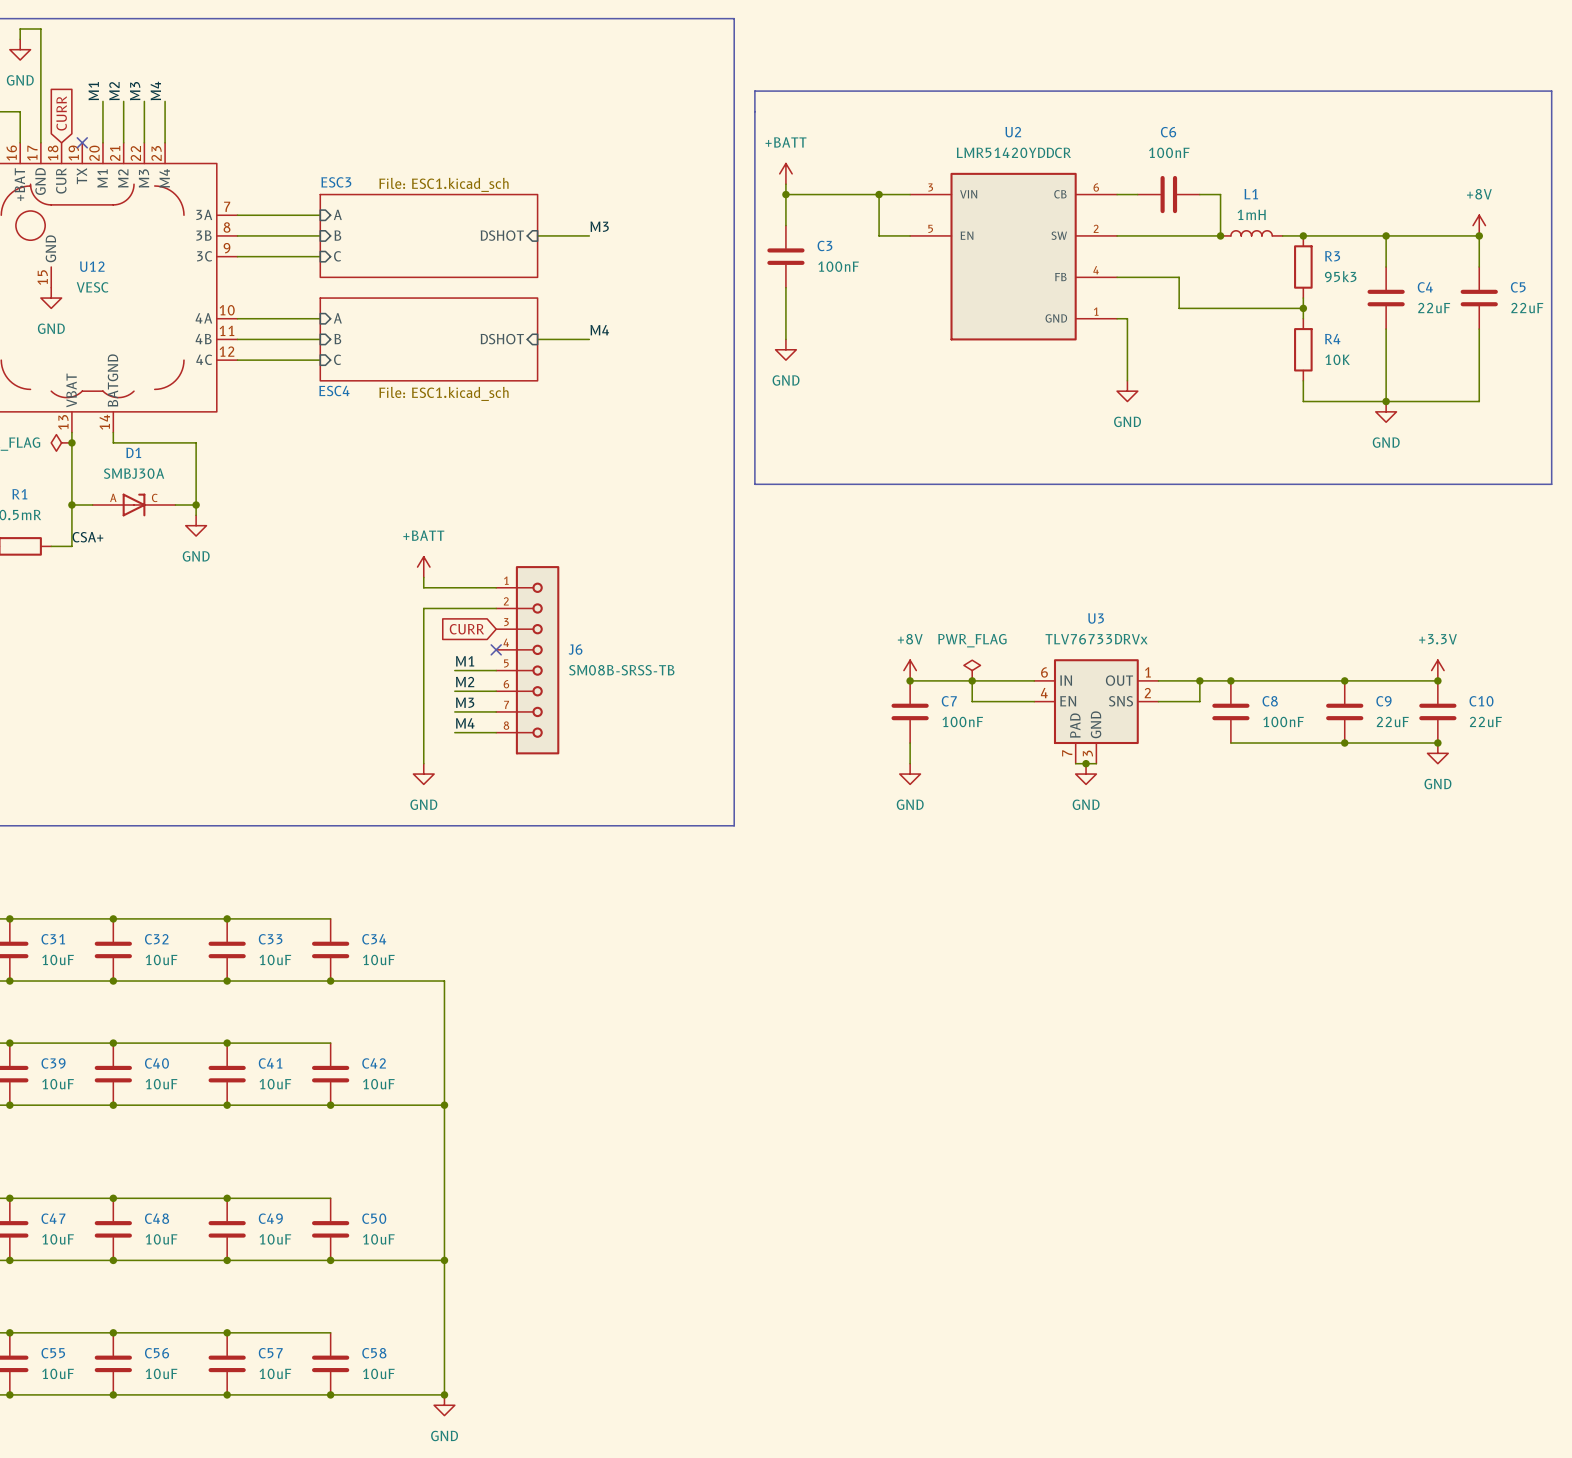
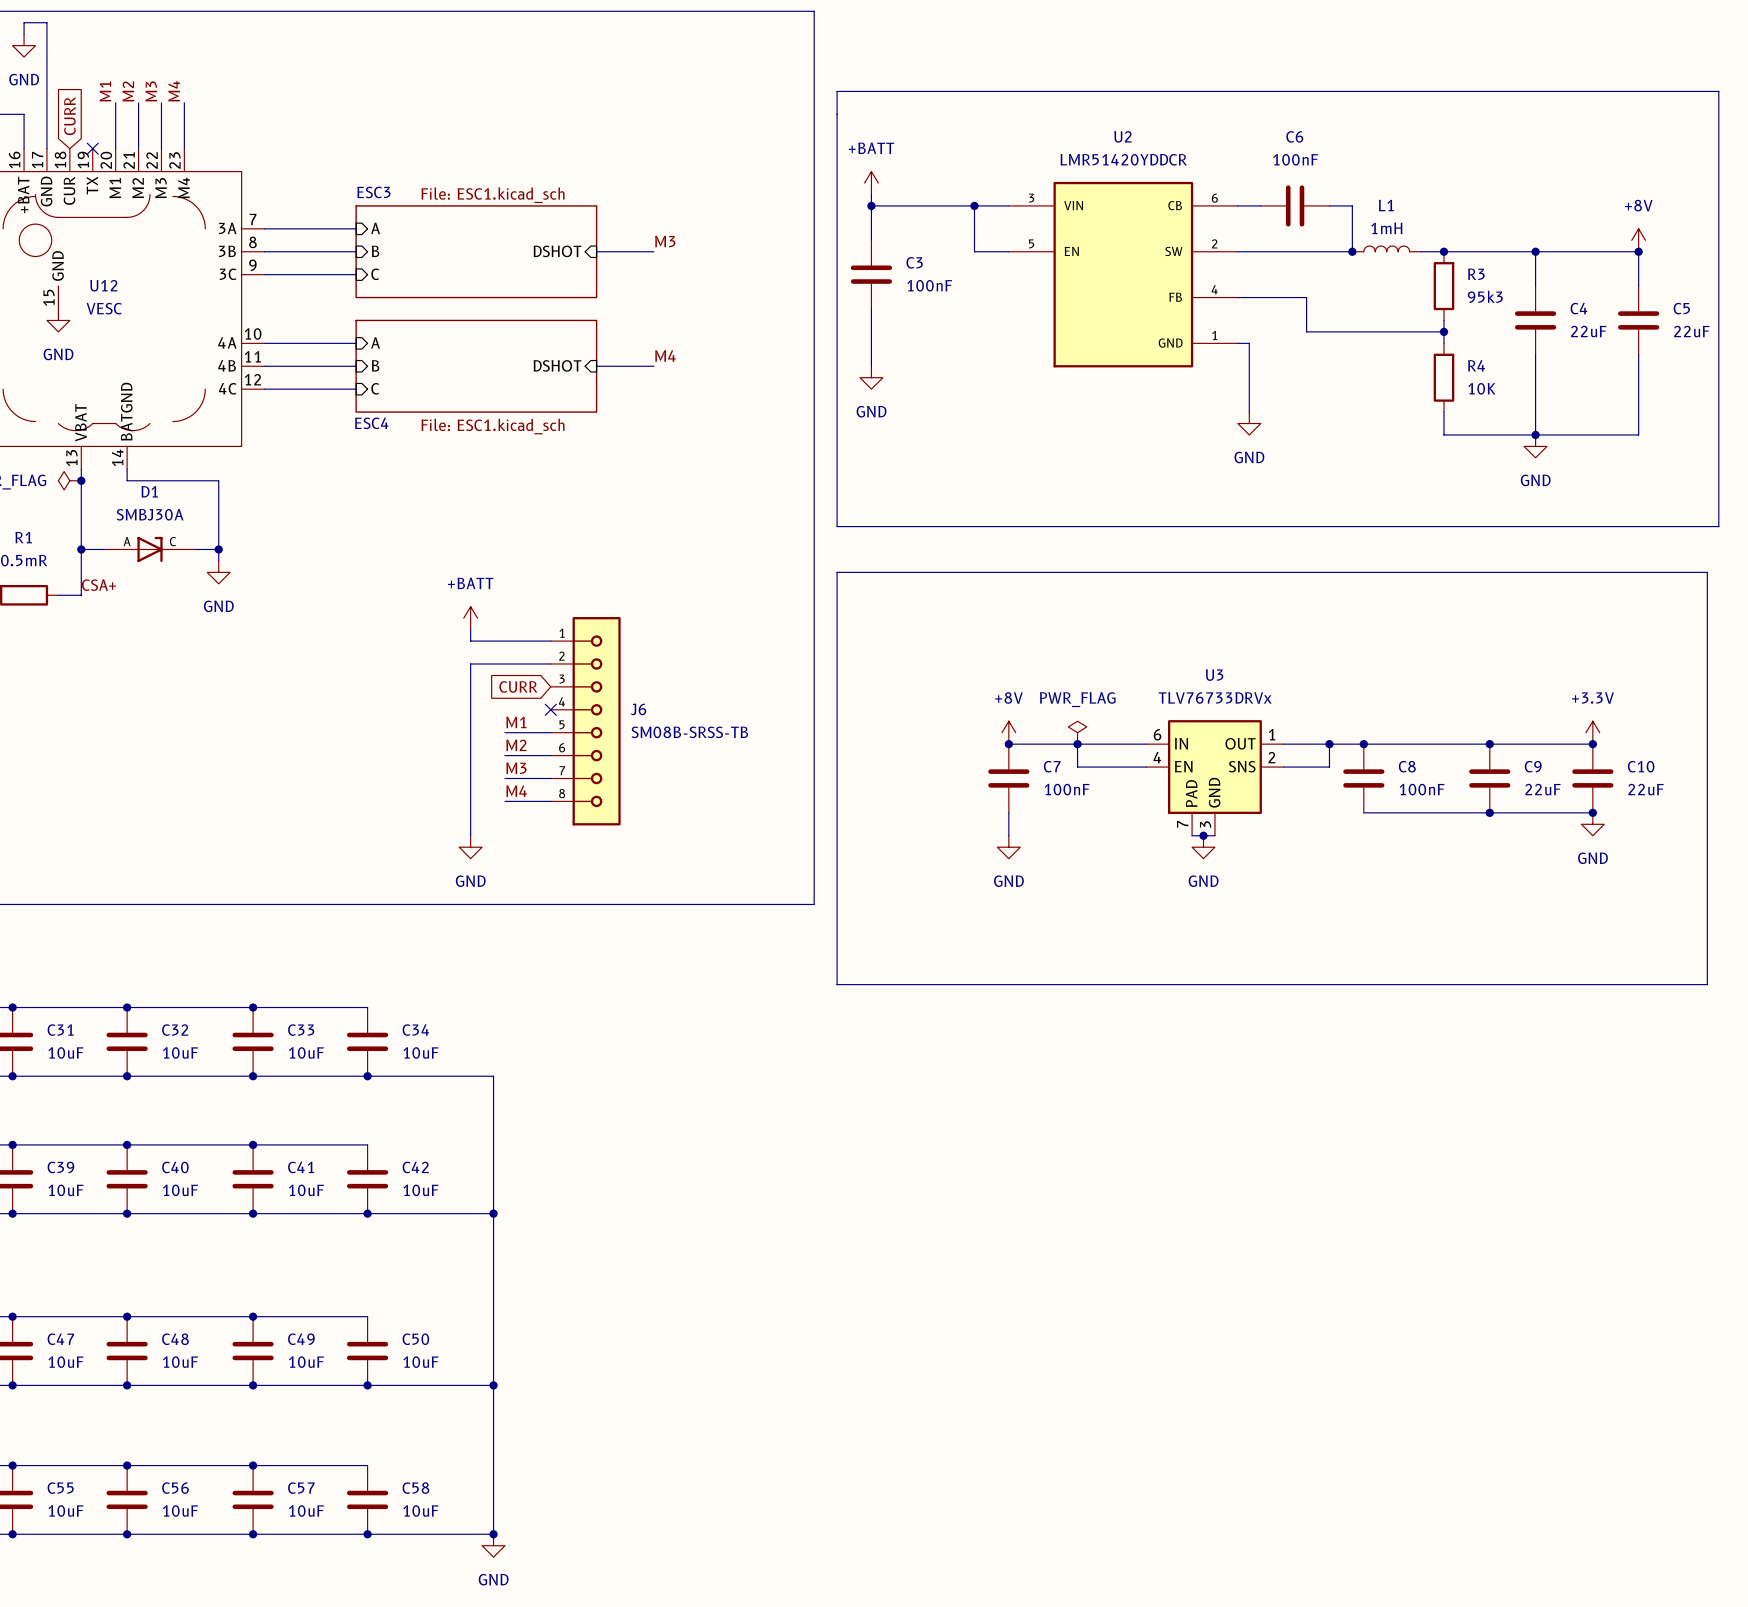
line: none -> (837, 572) (837, 984) (1707, 984) (1707, 572) (837, 572)

